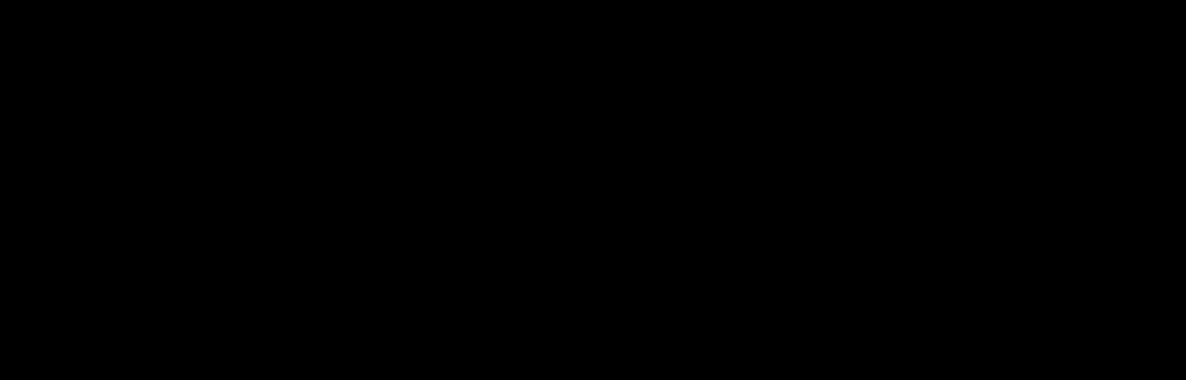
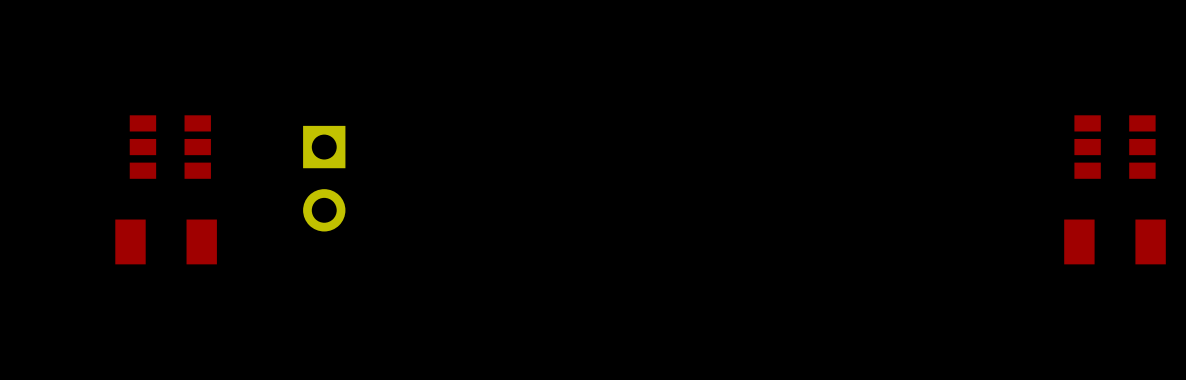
part: none -> (170, 147)
part: none -> (1115, 147)
part: none -> (324, 178)
part: none -> (166, 241)
part: none -> (1115, 241)

